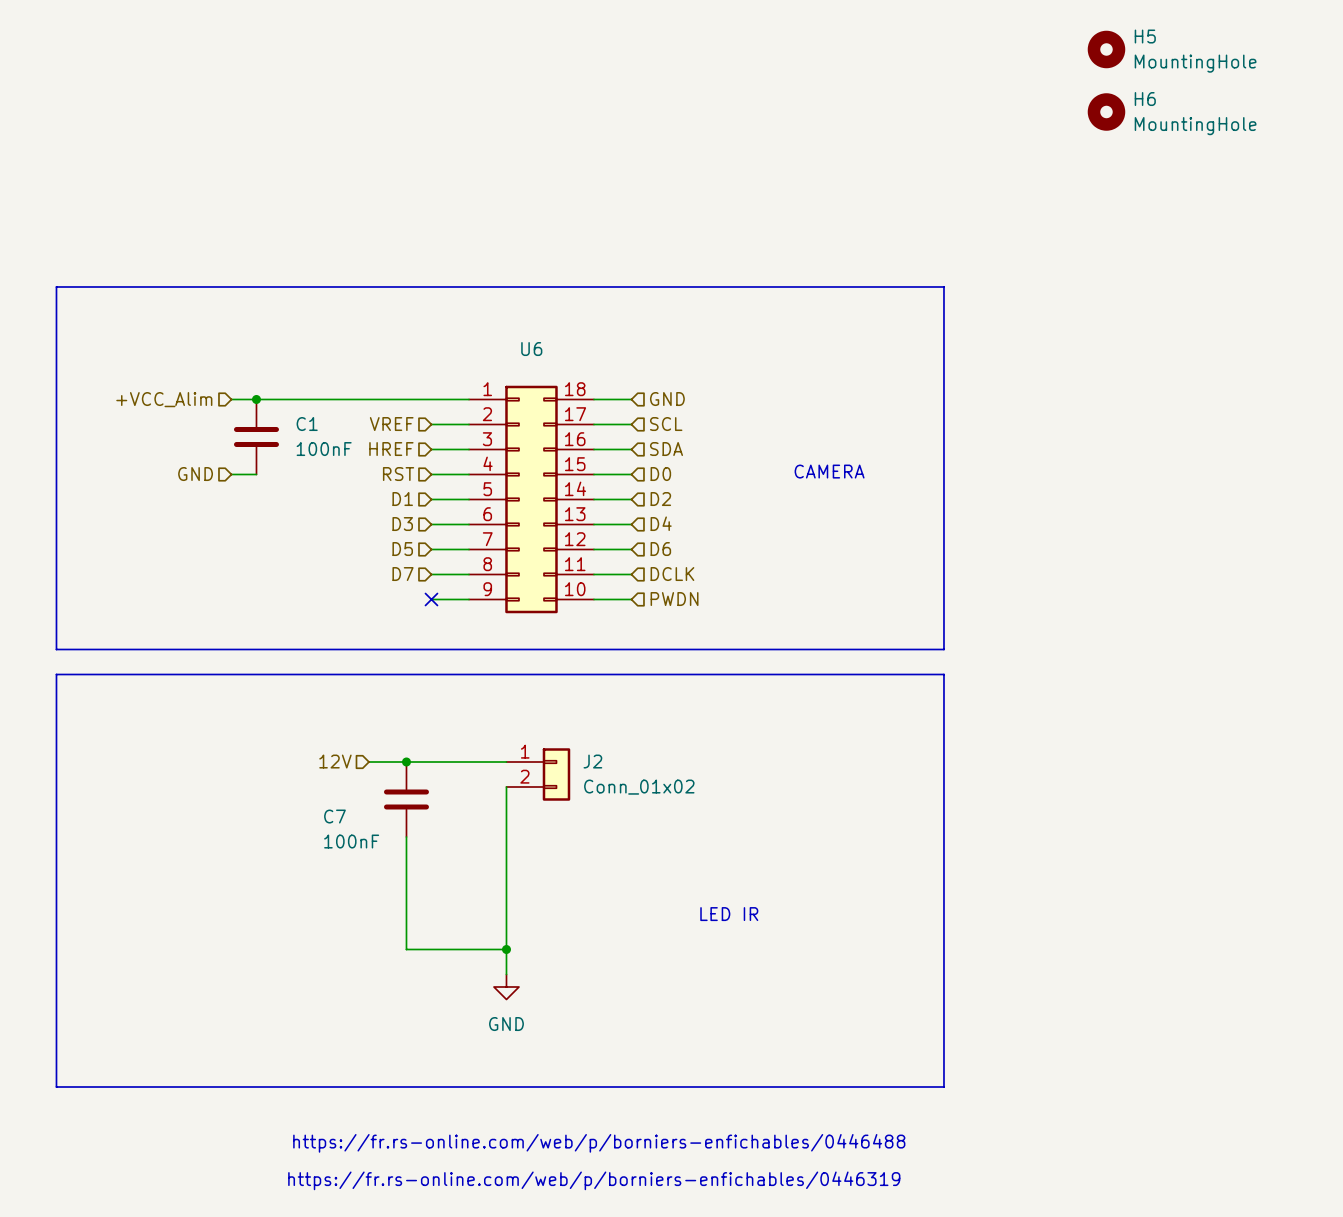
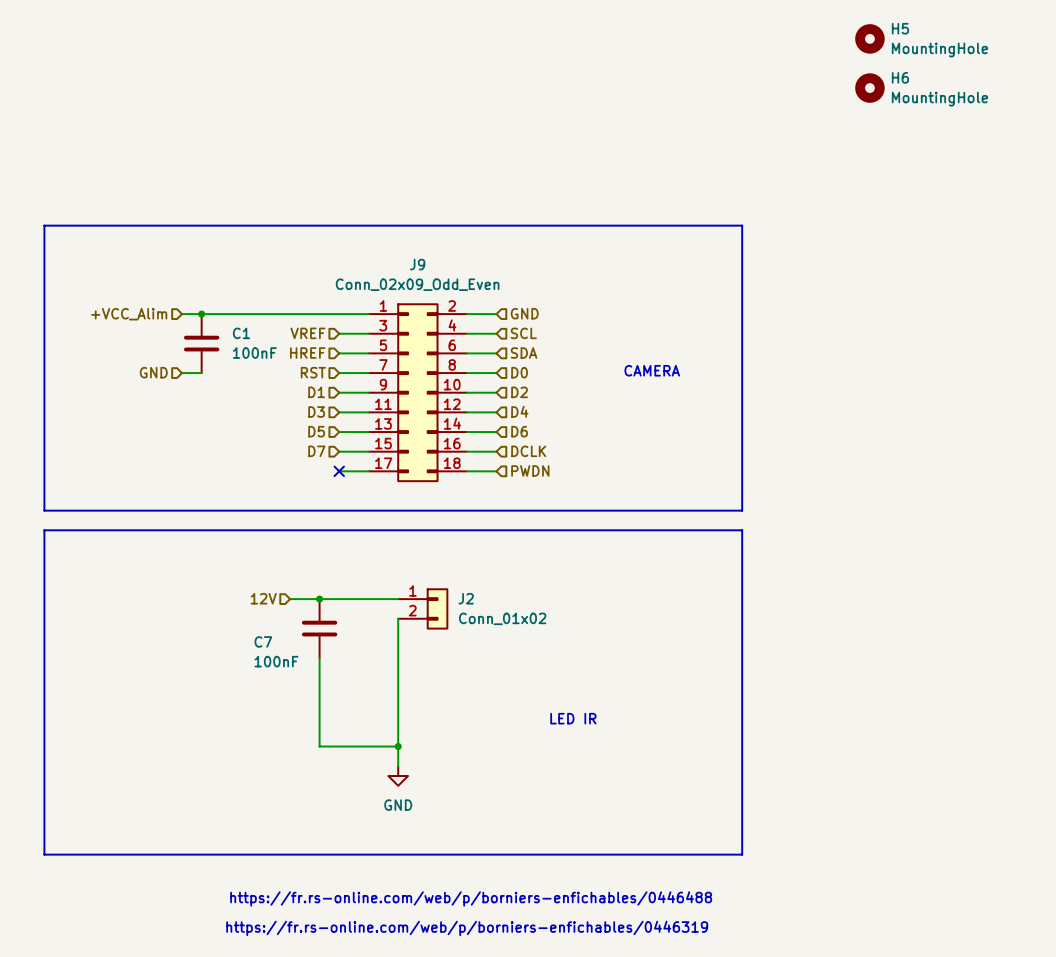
U6 name: U6 (531, 349) -> J9 (417, 264)
U6 value: none -> Conn_02x09_Odd_Even (417, 284)
U6 symbol: [468, 385, 594, 614] -> [368, 303, 468, 483]

